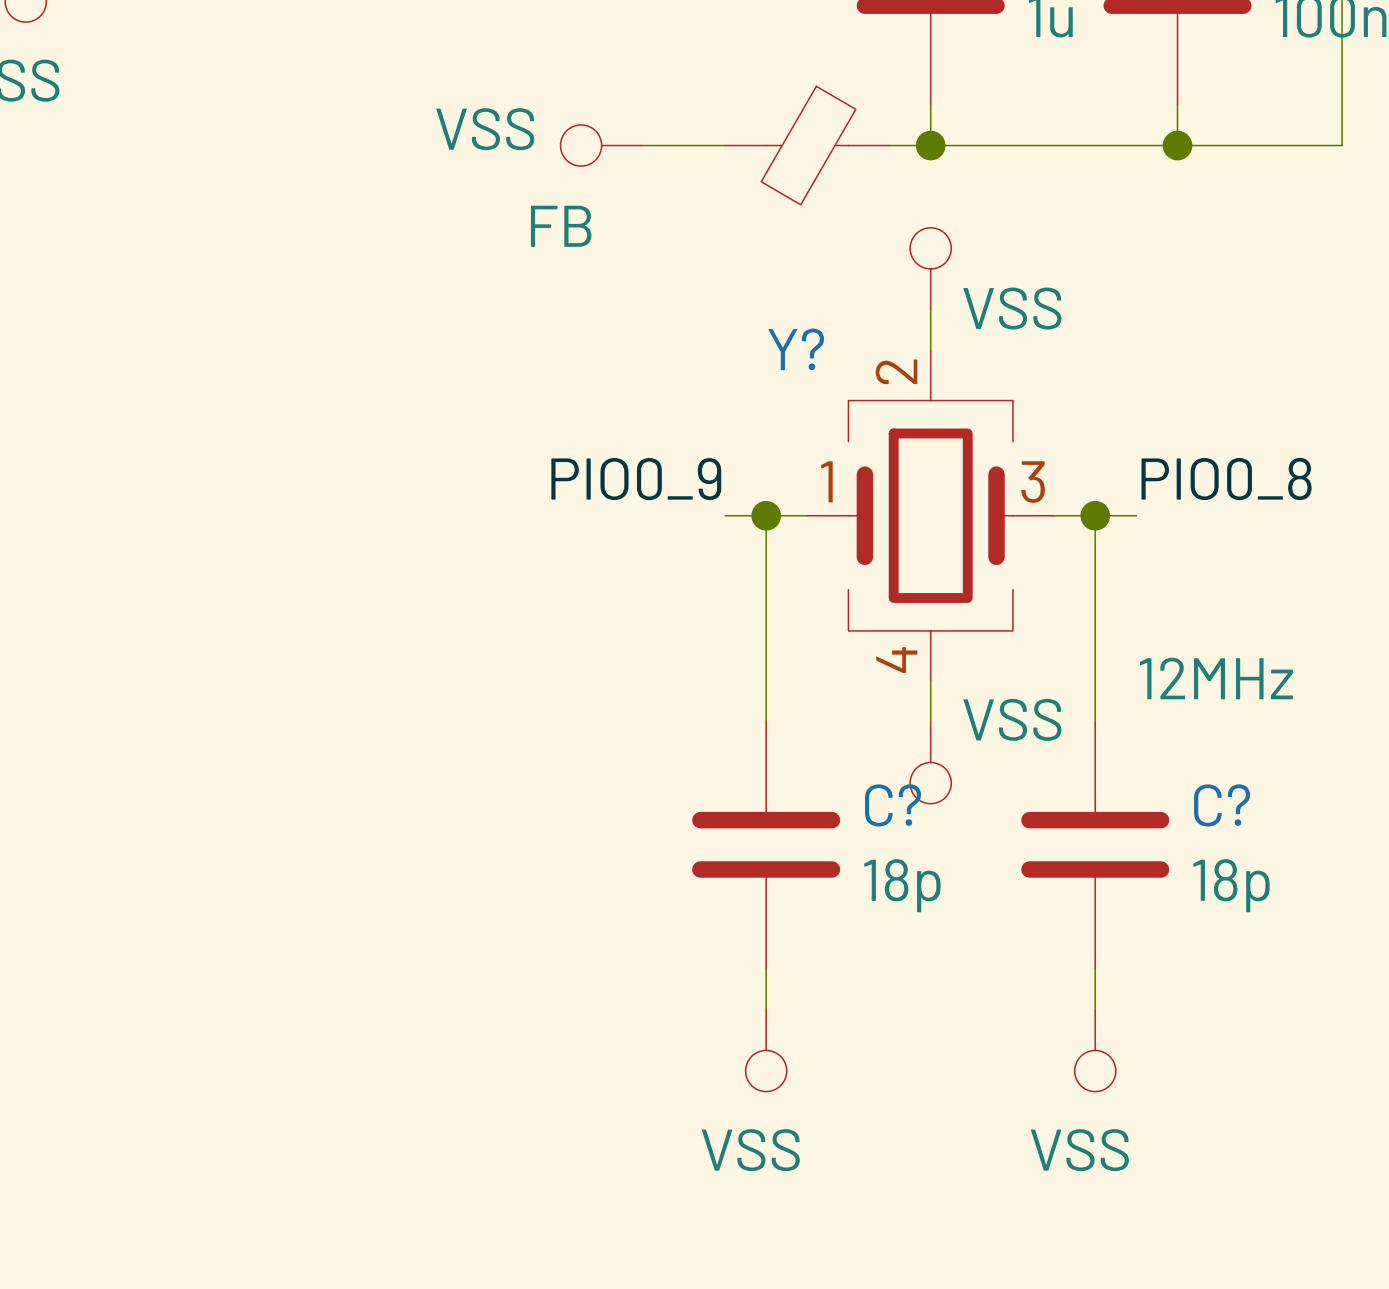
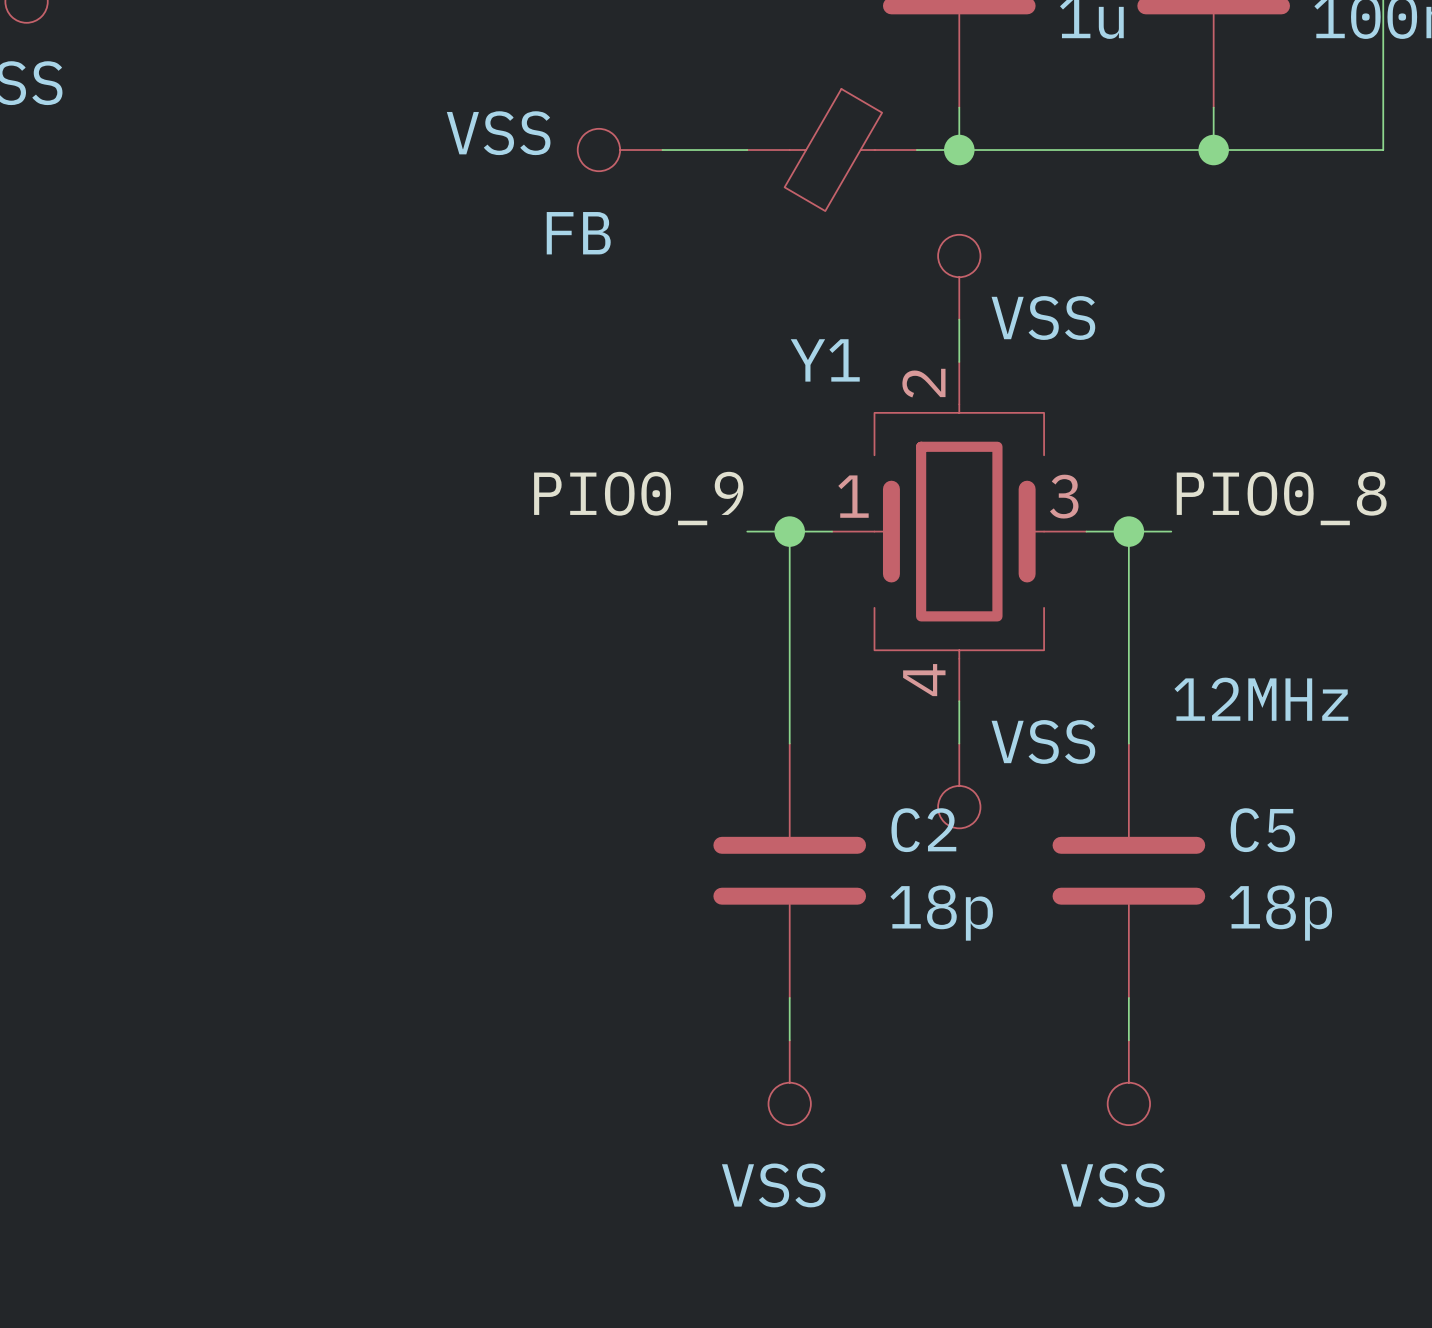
Y? name: Y? (796, 349) -> Y1 (825, 360)
C? name: C? (893, 805) -> C2 (923, 830)
C? name: C? (1222, 805) -> C5 (1262, 830)

